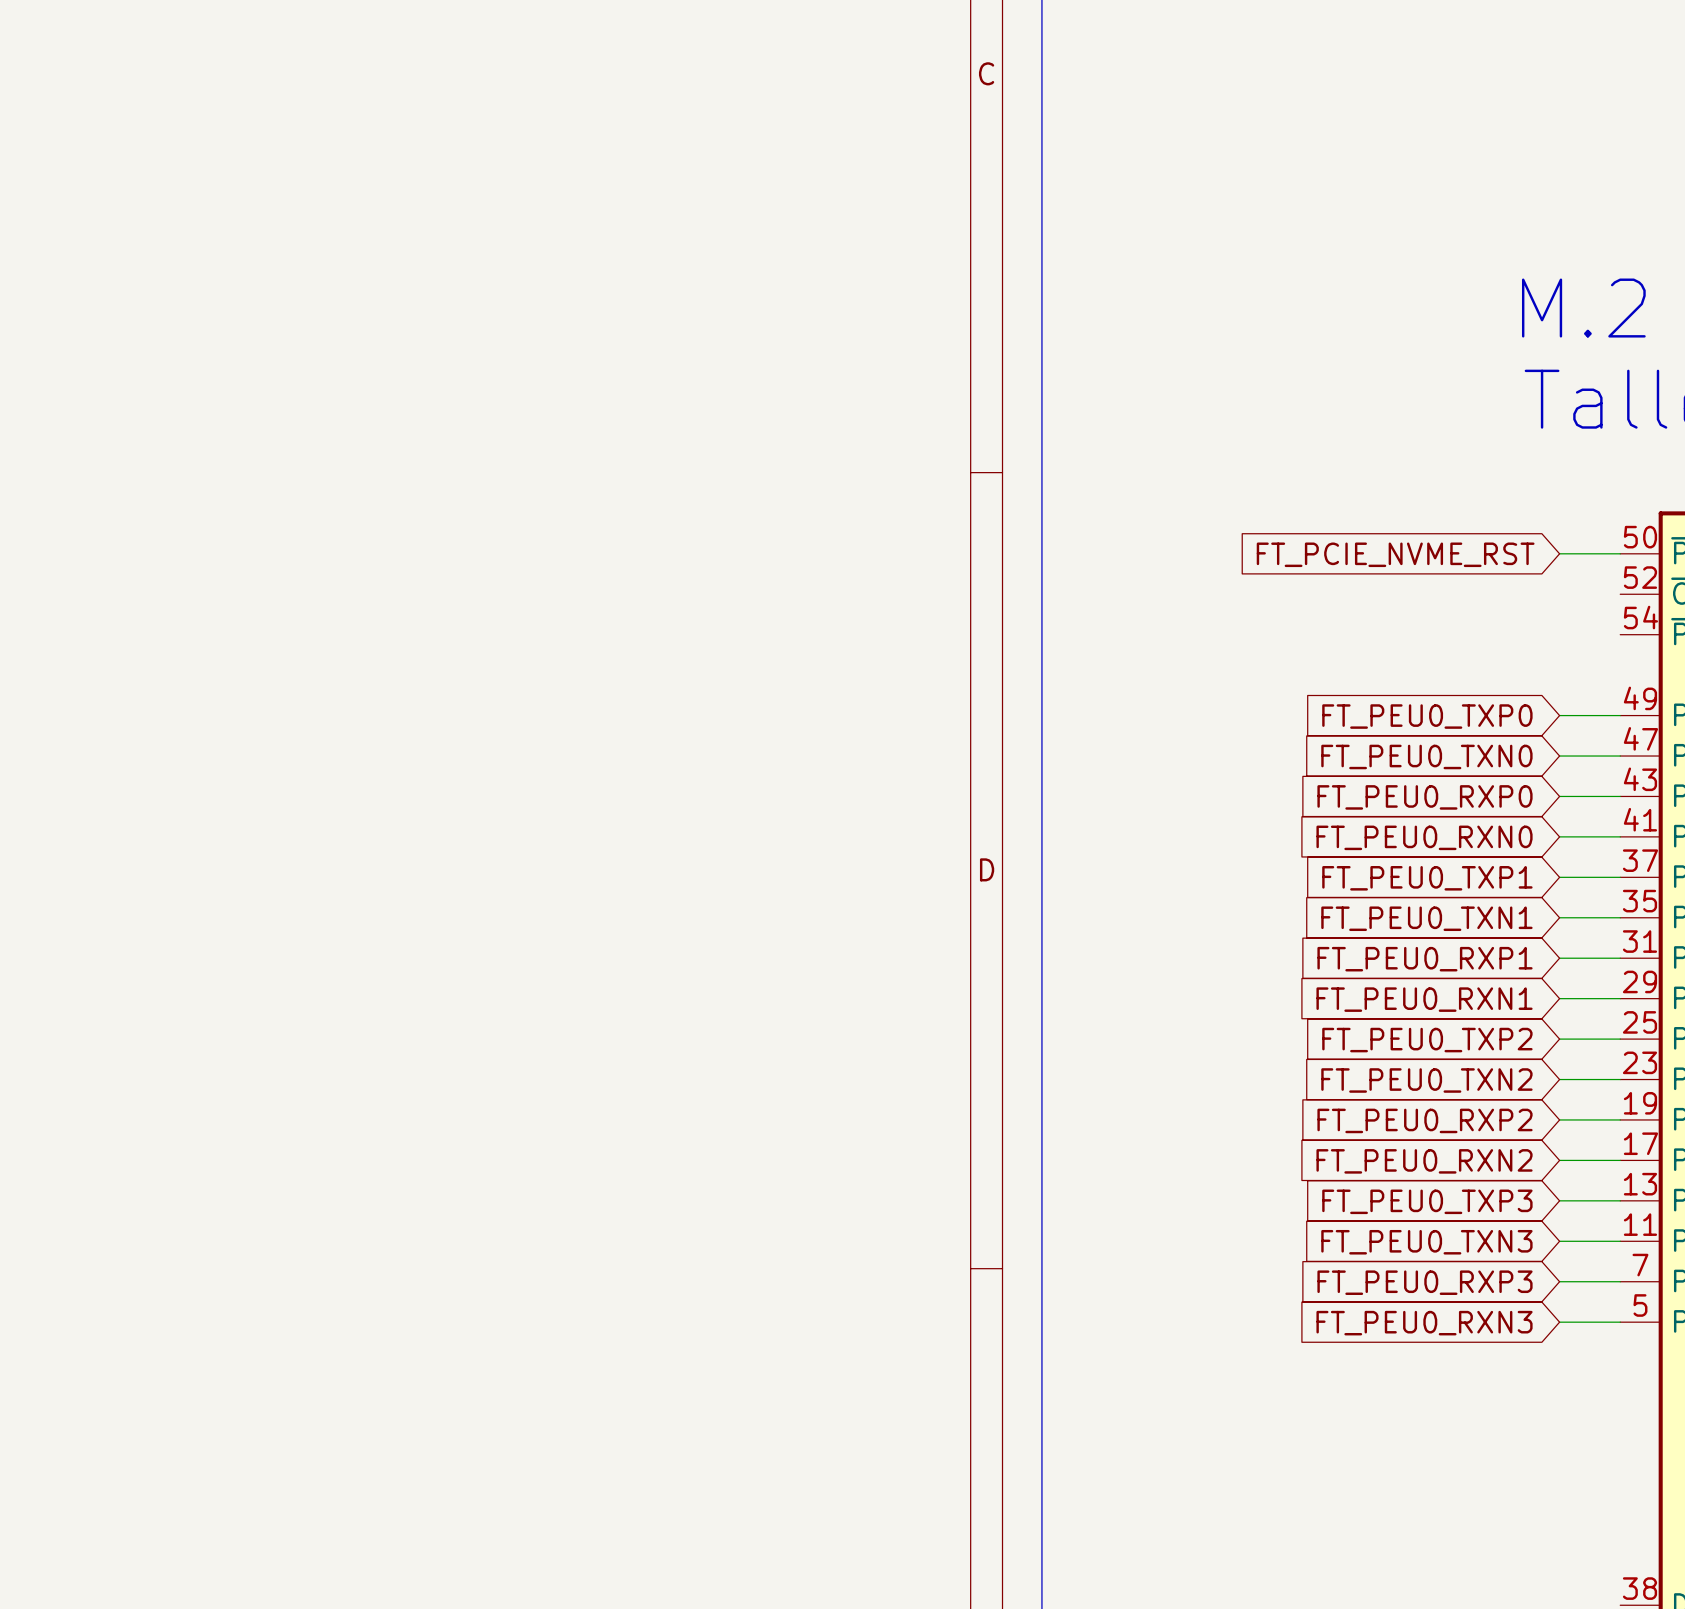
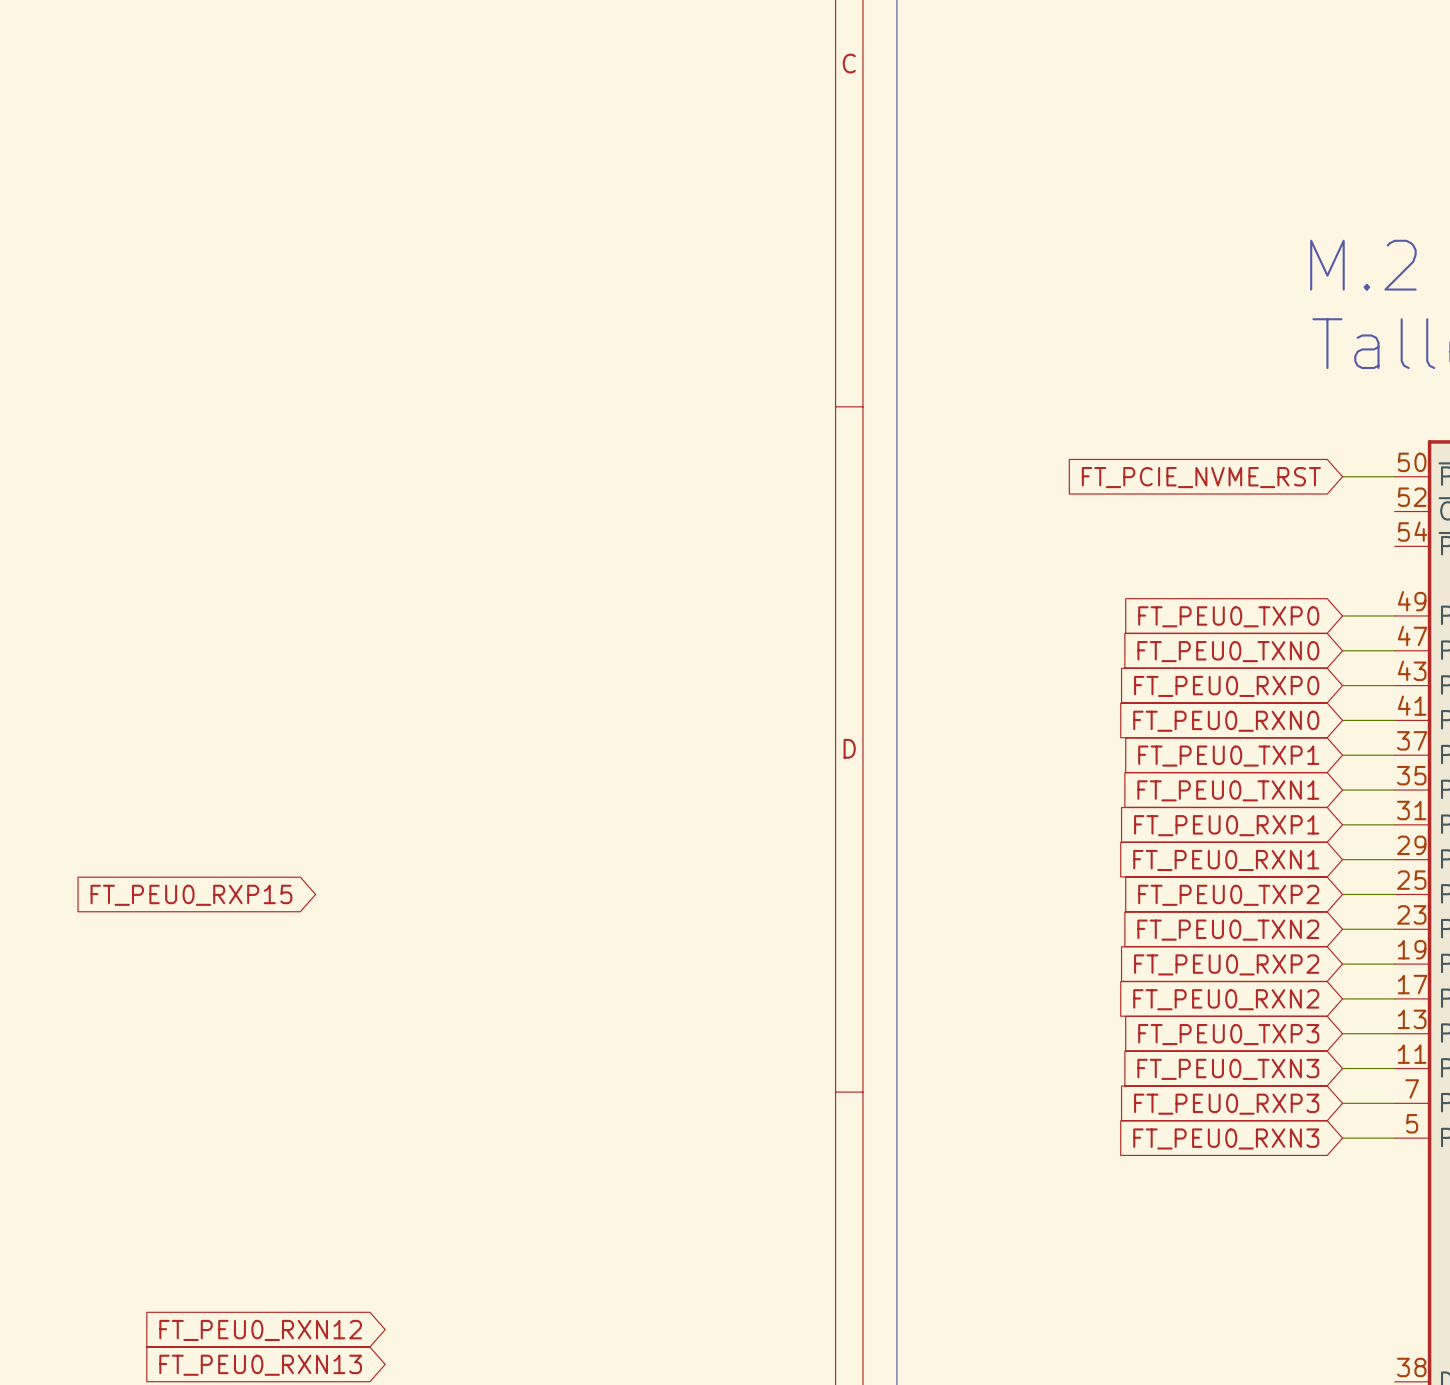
global label: none -> FT_PEU0_RXP15 (191, 895)
global label: none -> FT_PEU0_RXN12 (260, 1330)
global label: none -> FT_PEU0_RXN13 (260, 1365)

